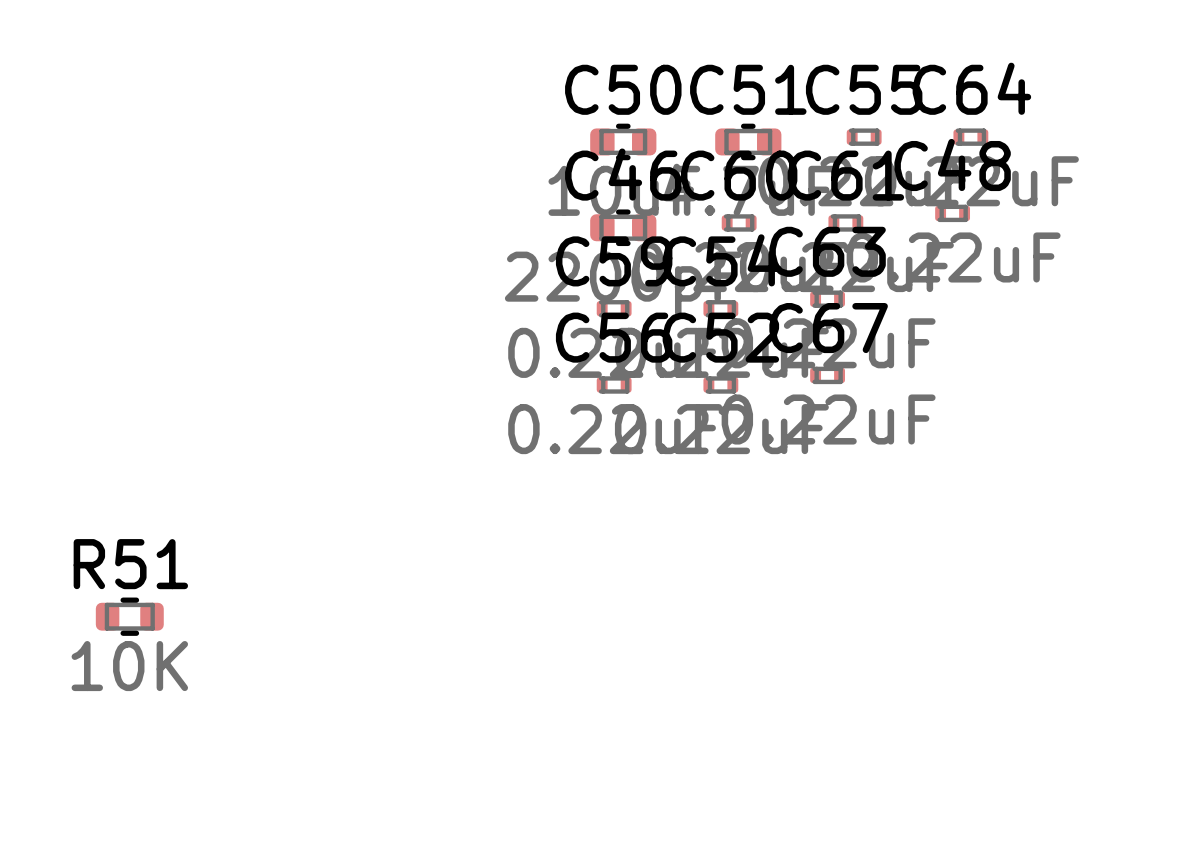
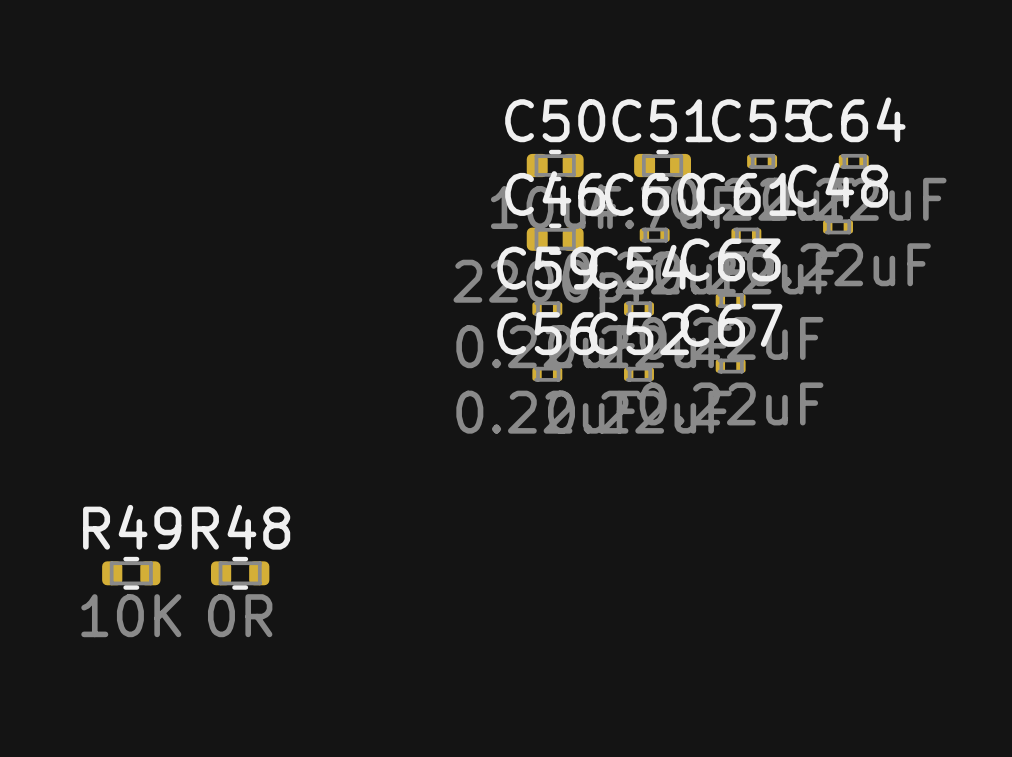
R51 name: R51 (130, 564) -> R49 (132, 527)
R48: none -> 0R (240, 573)

